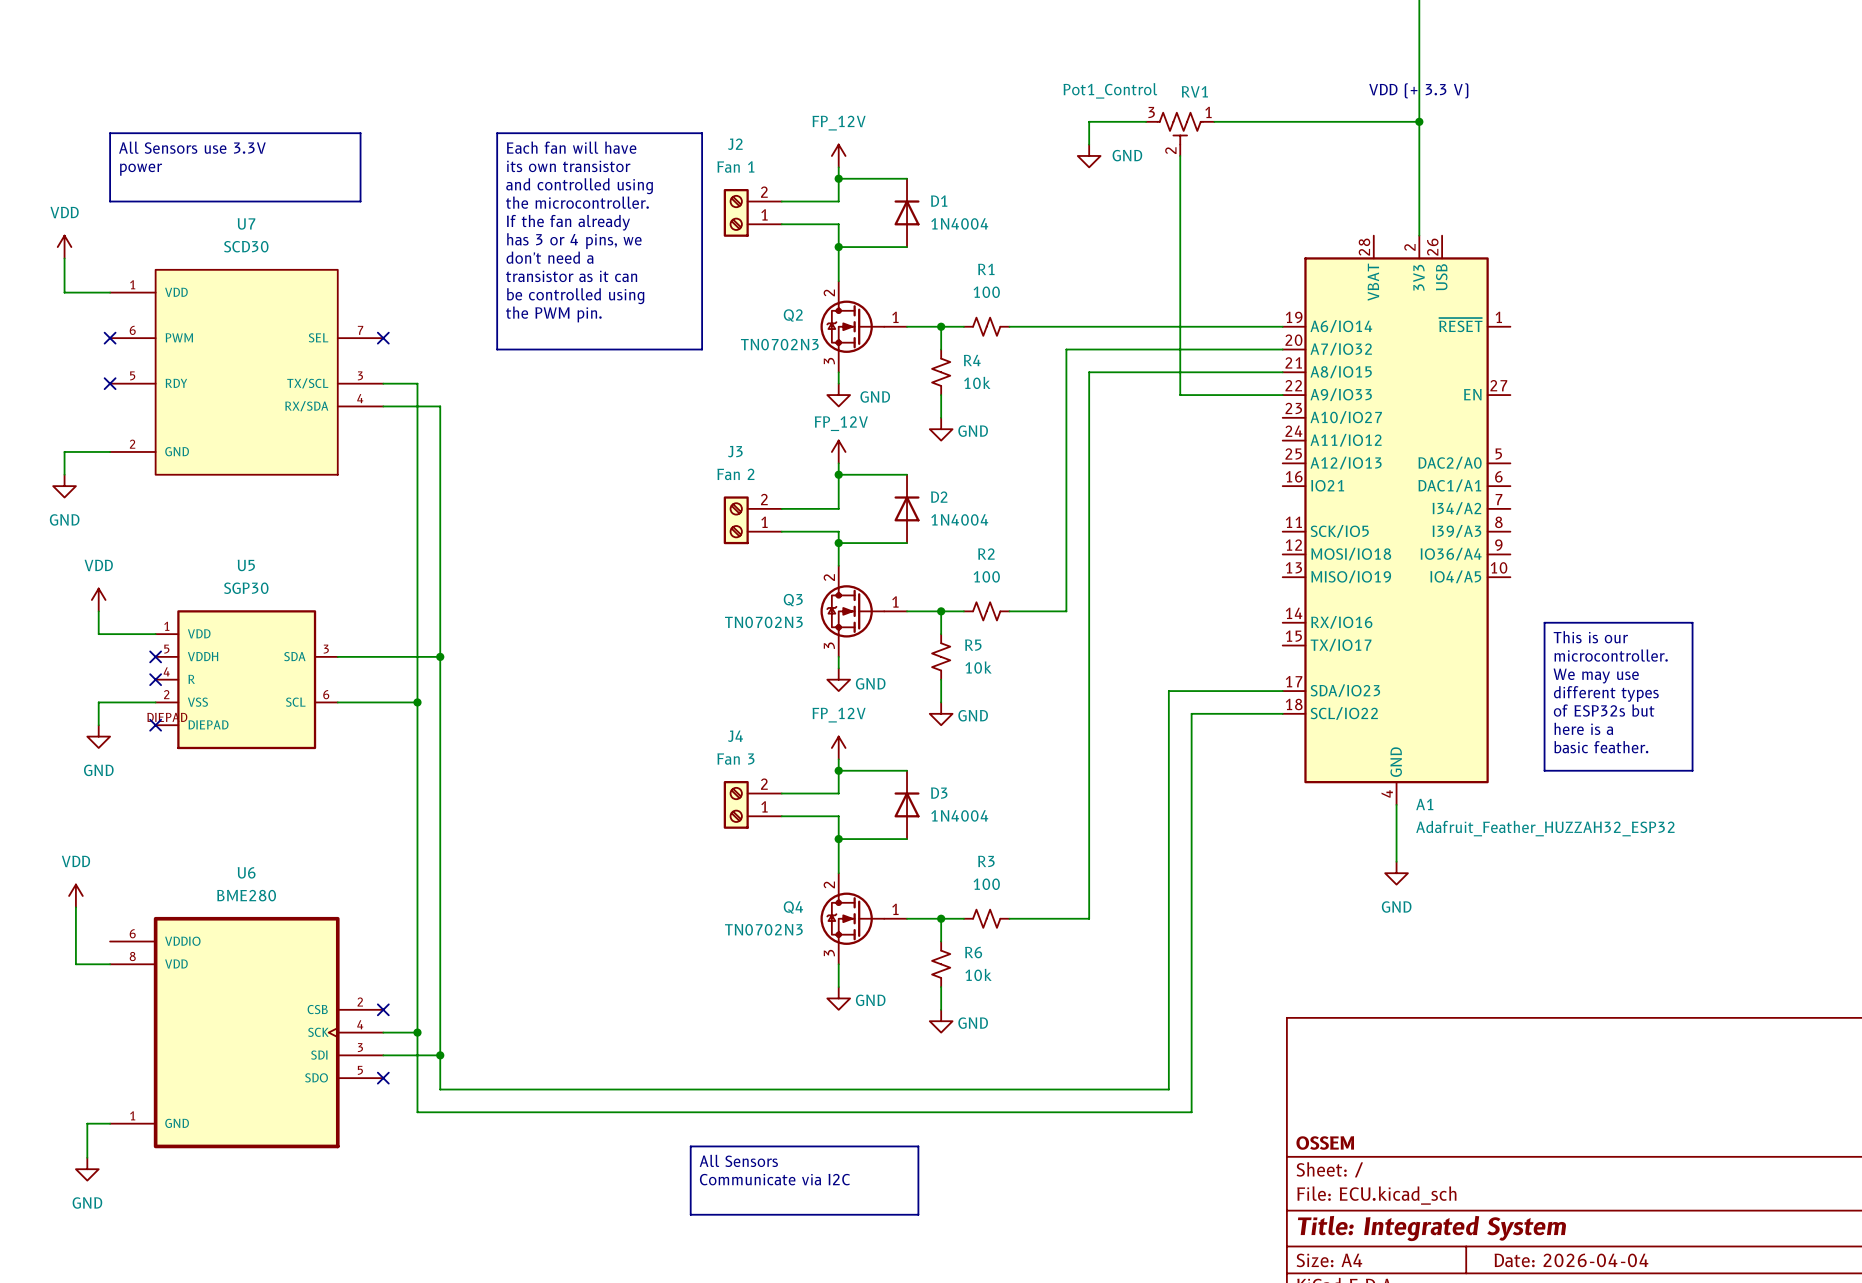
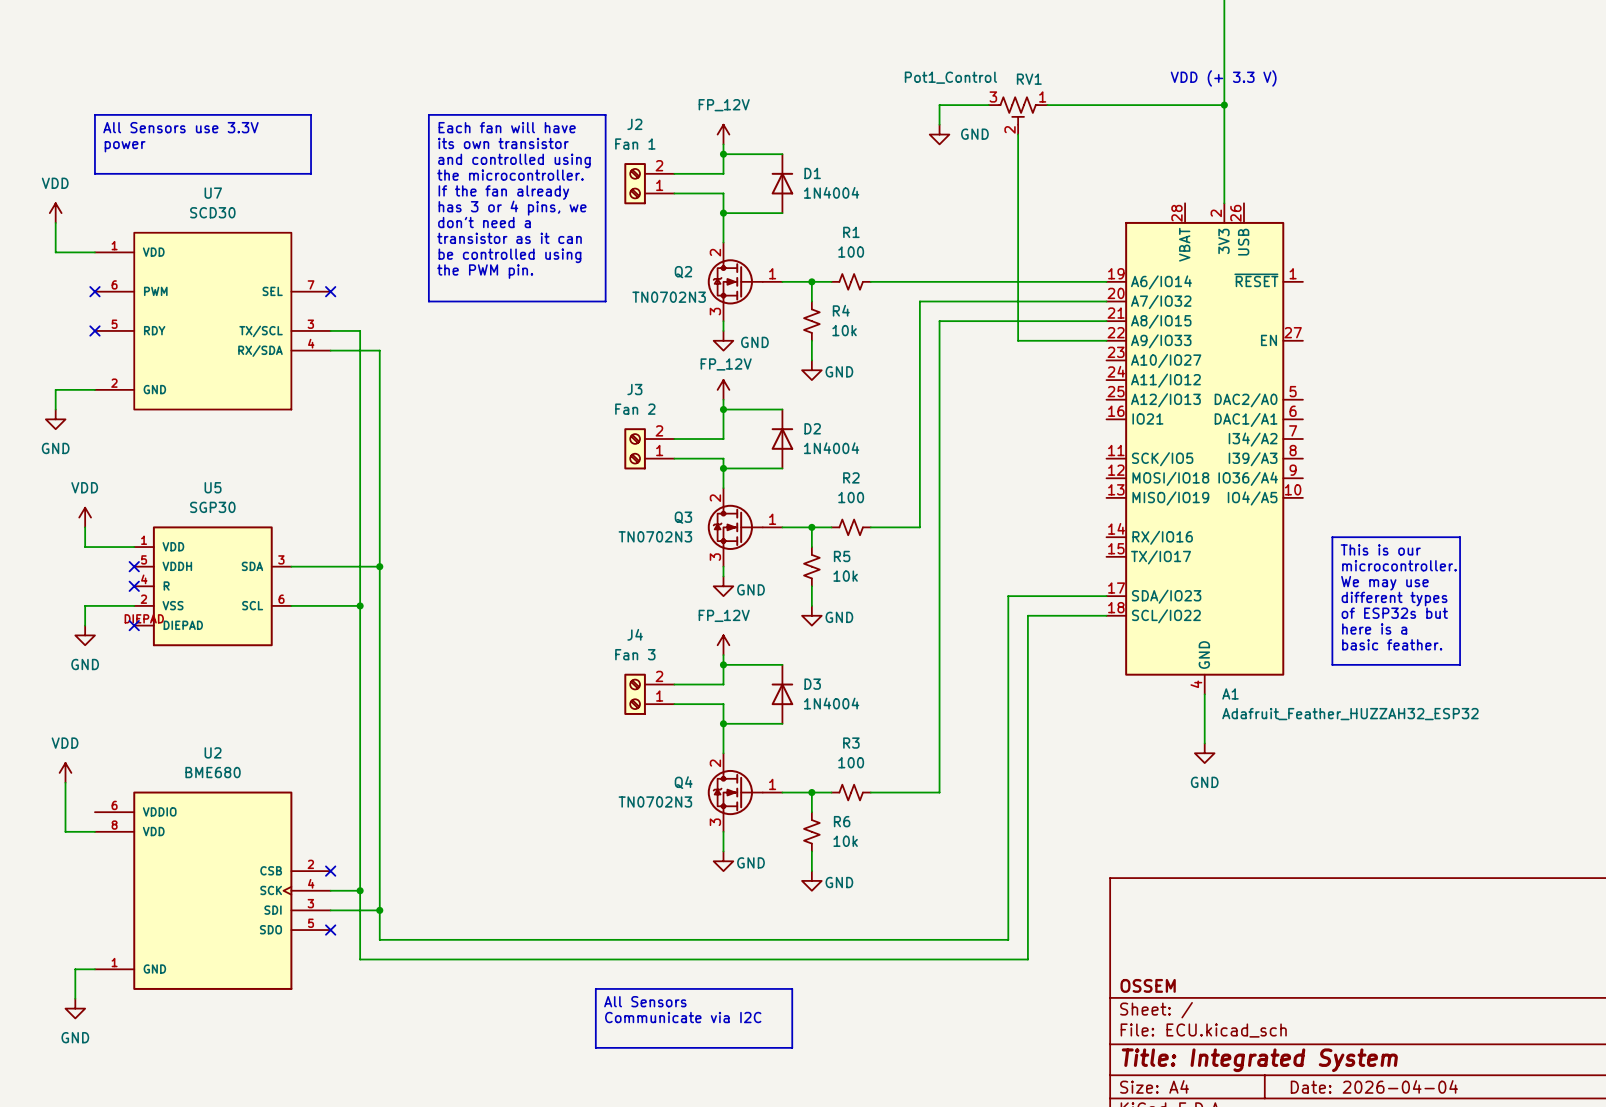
U6: BME280 (246, 1032) -> none
U2: none -> BME680 (212, 890)

